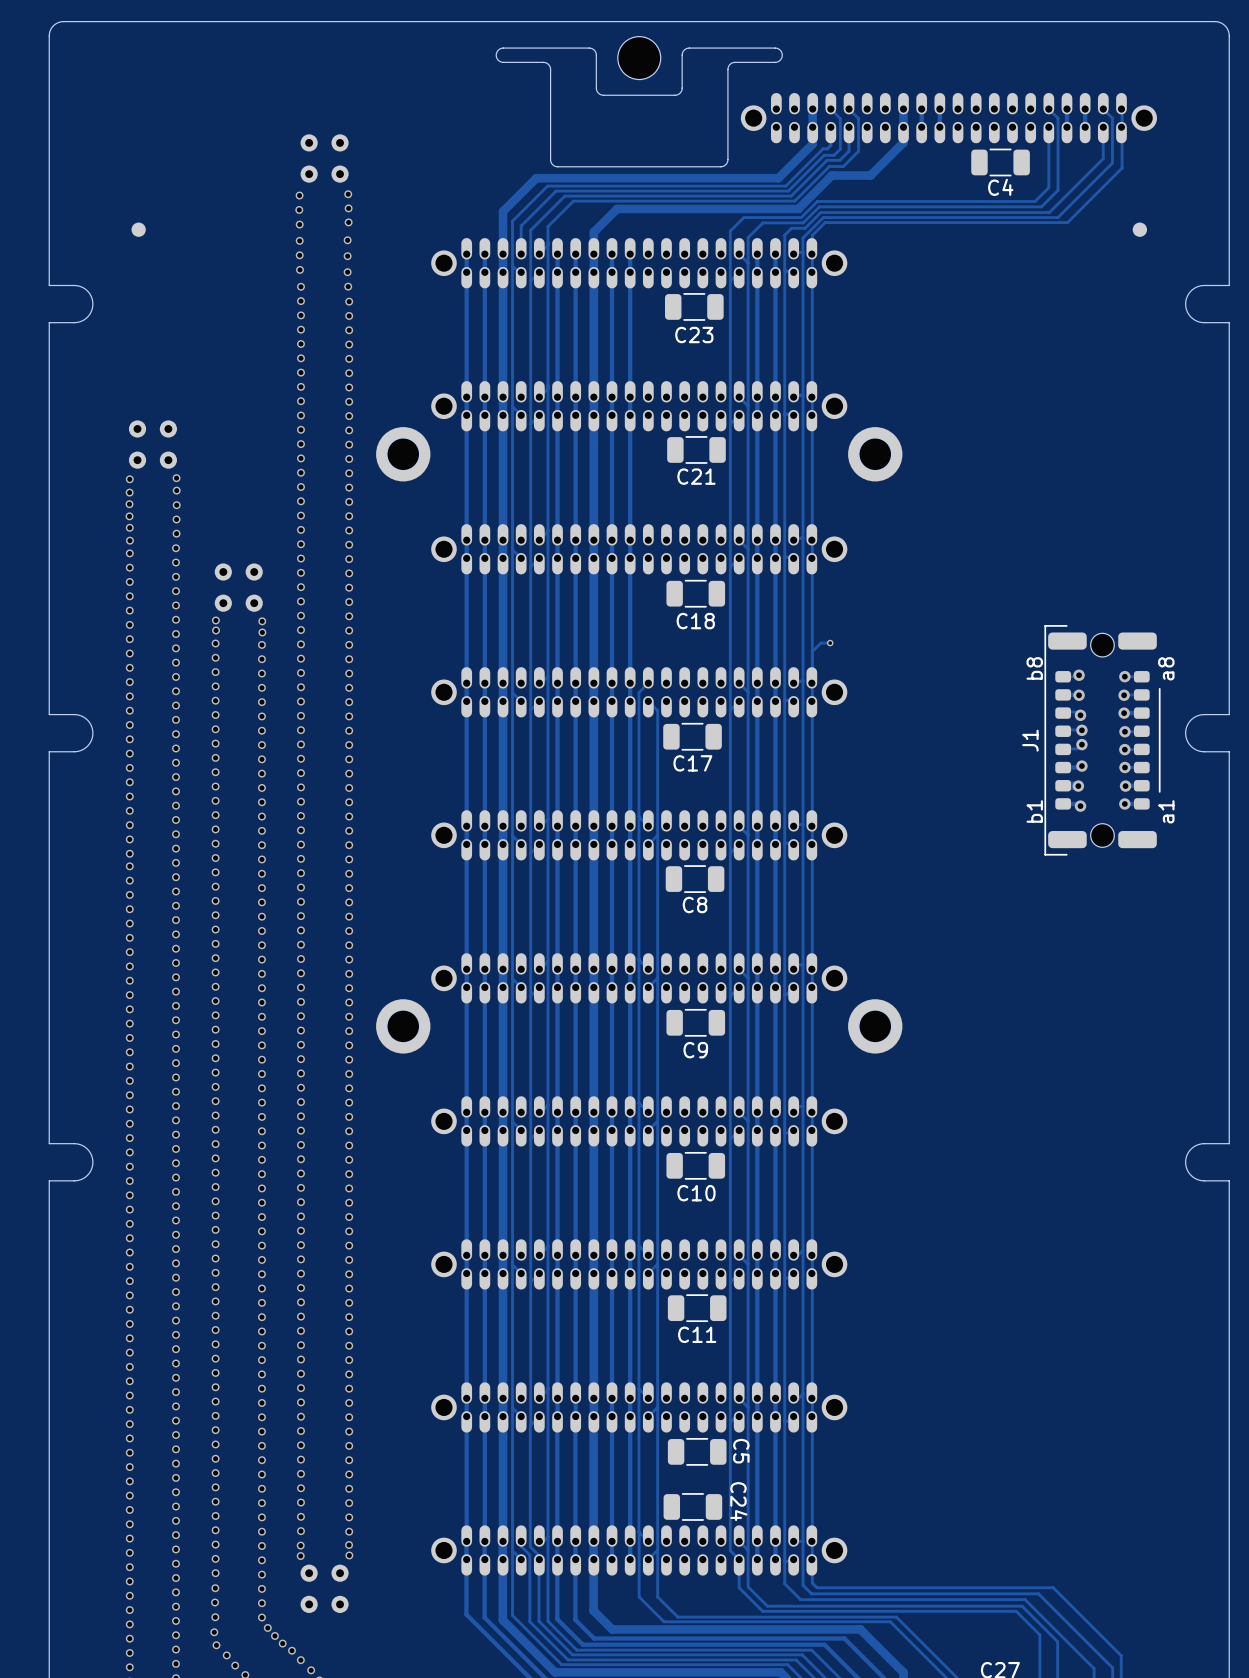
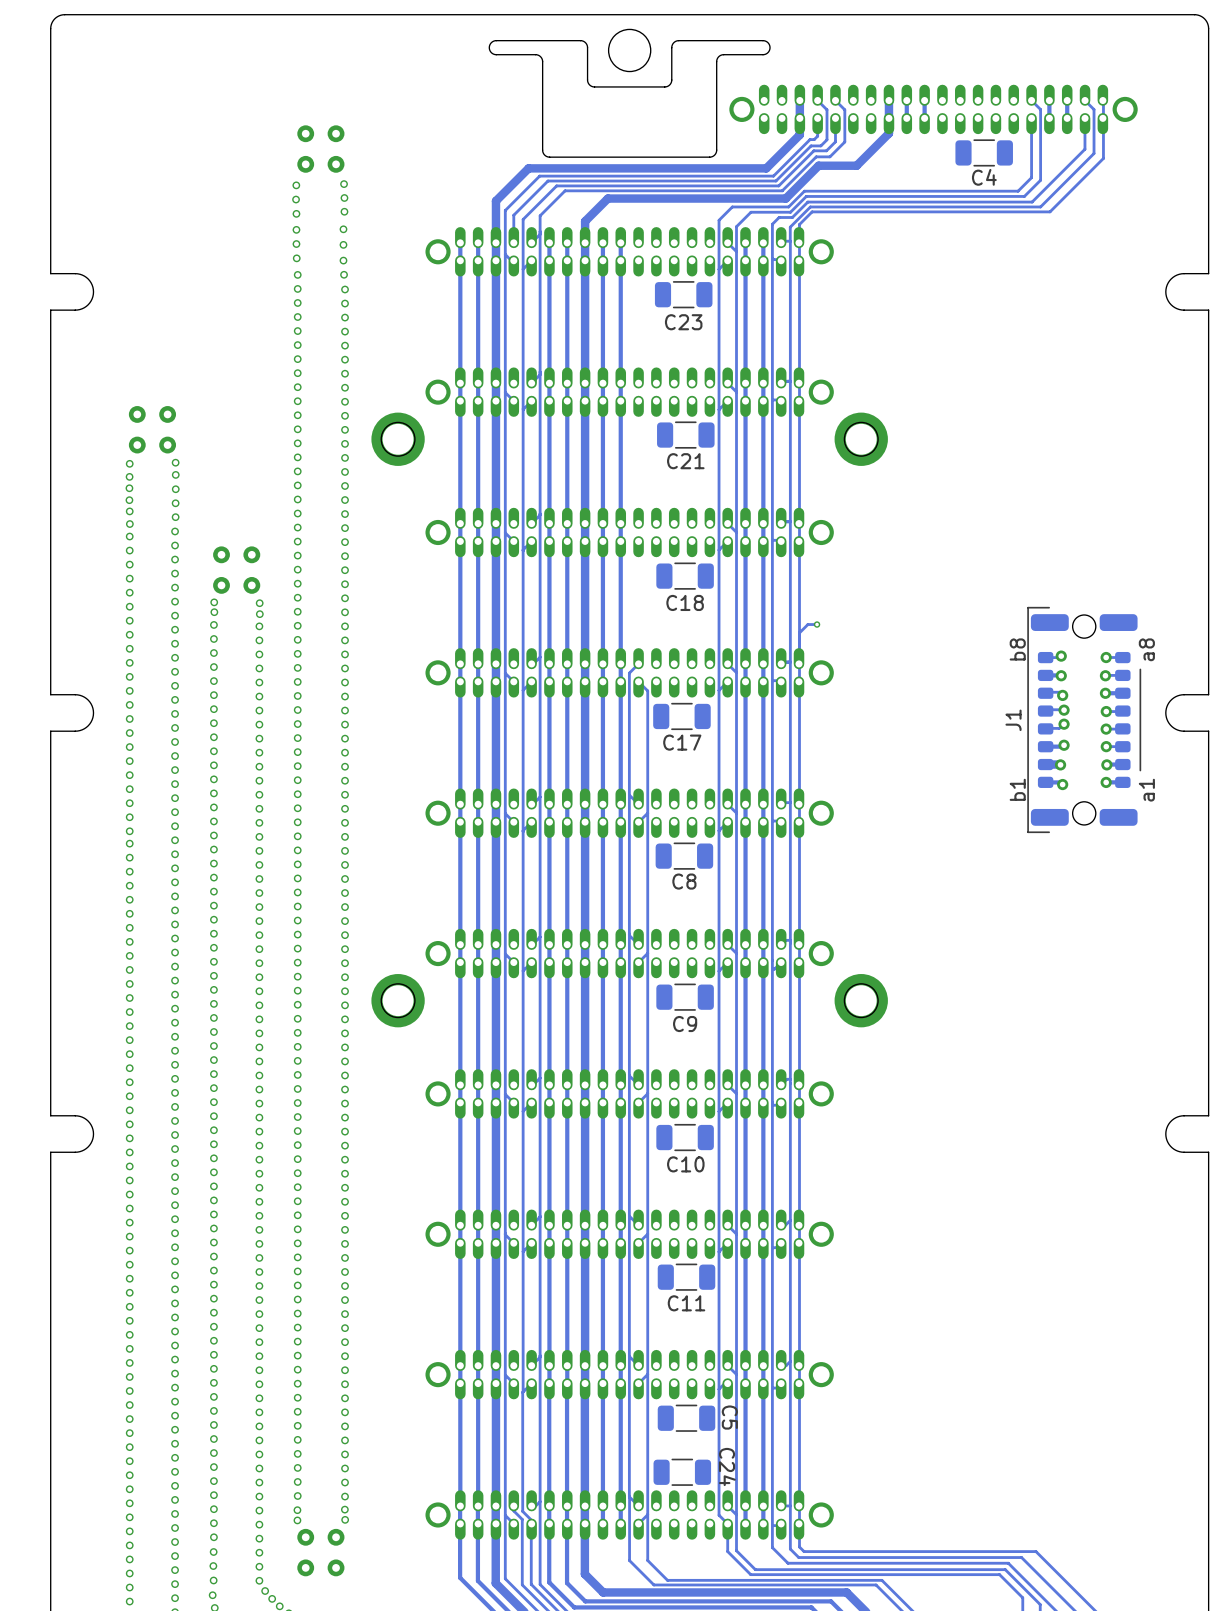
part: (138, 229) -> none
part: (1139, 229) -> none

